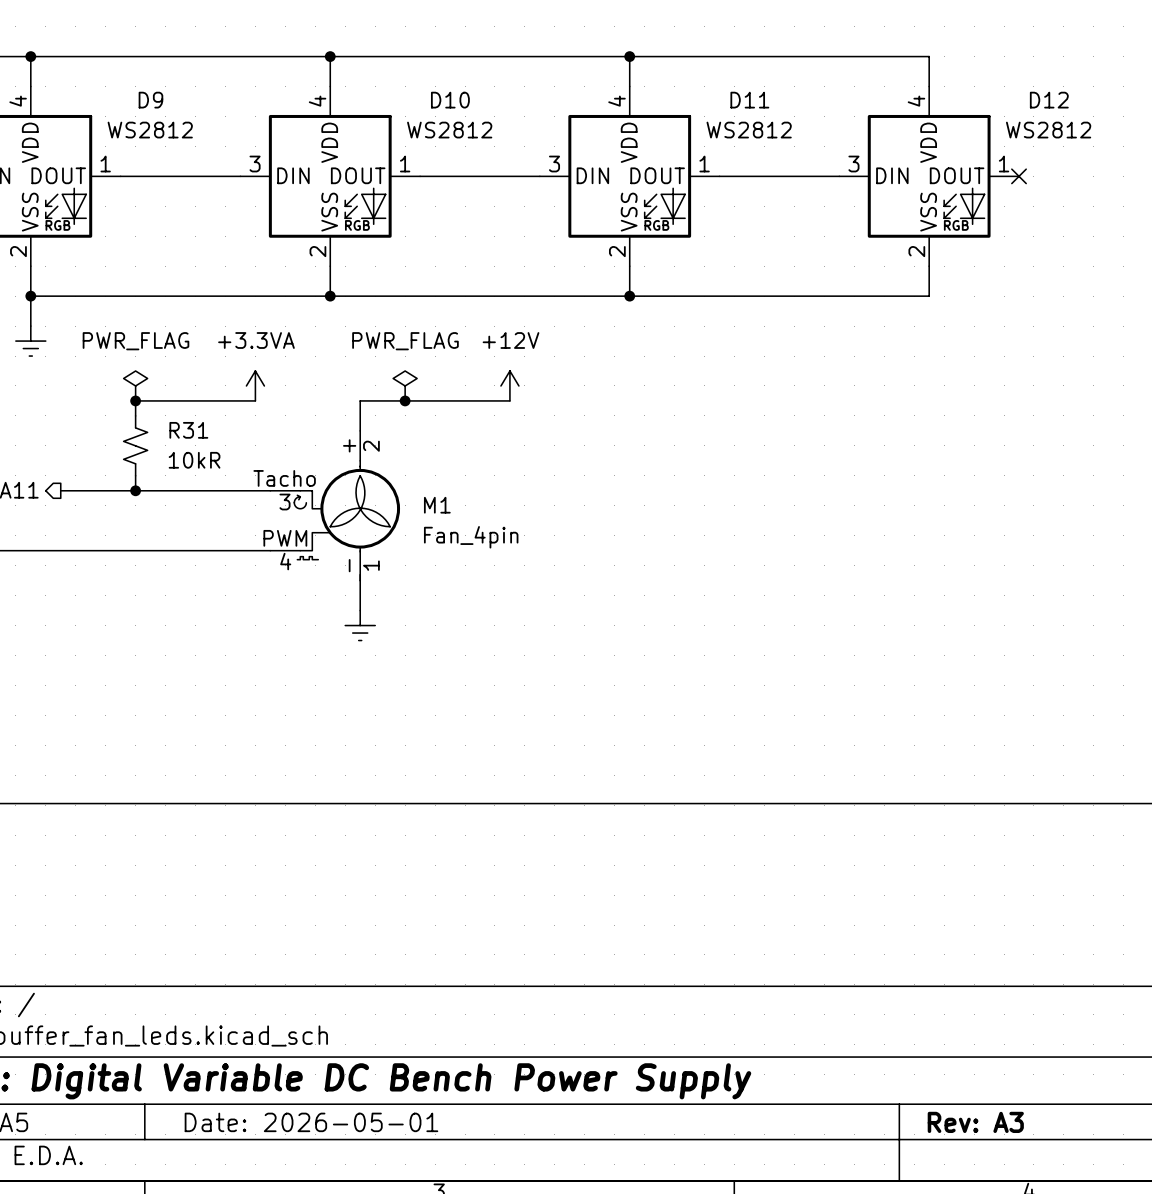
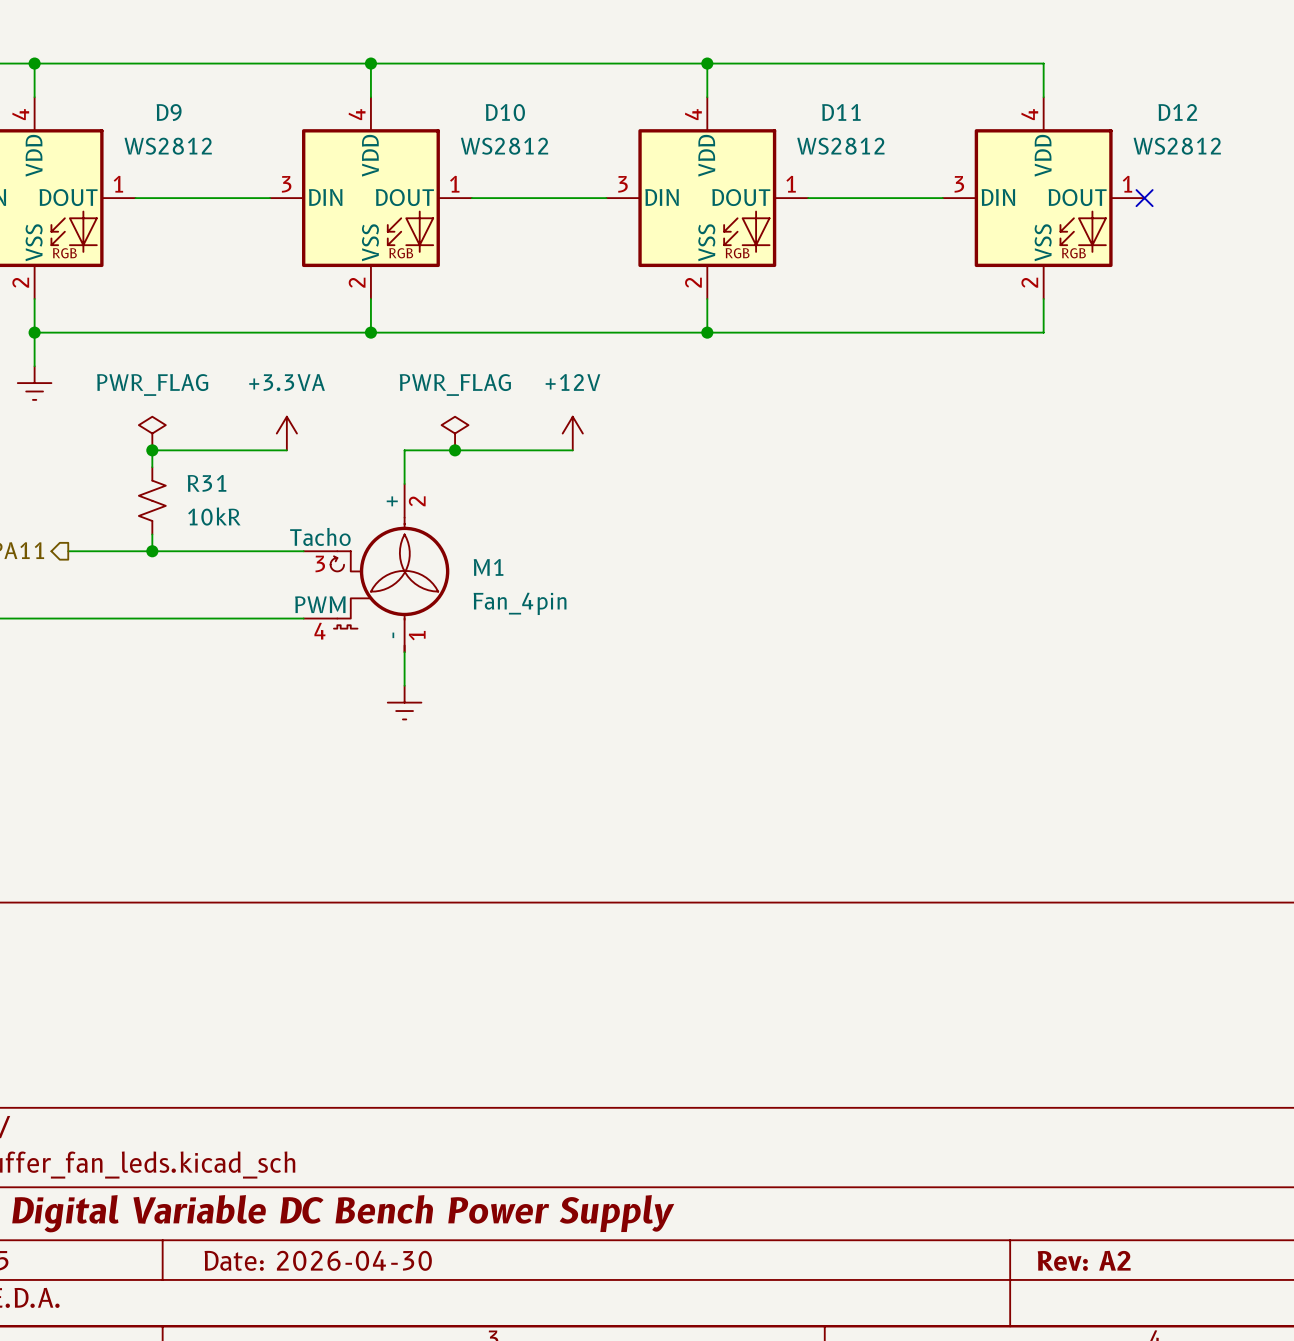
title block: Date: 2026-05-01 (311, 1122) -> Date: 2026-04-30 (318, 1260)
title block: Rev: A3 (975, 1122) -> Rev: A2 (1084, 1260)

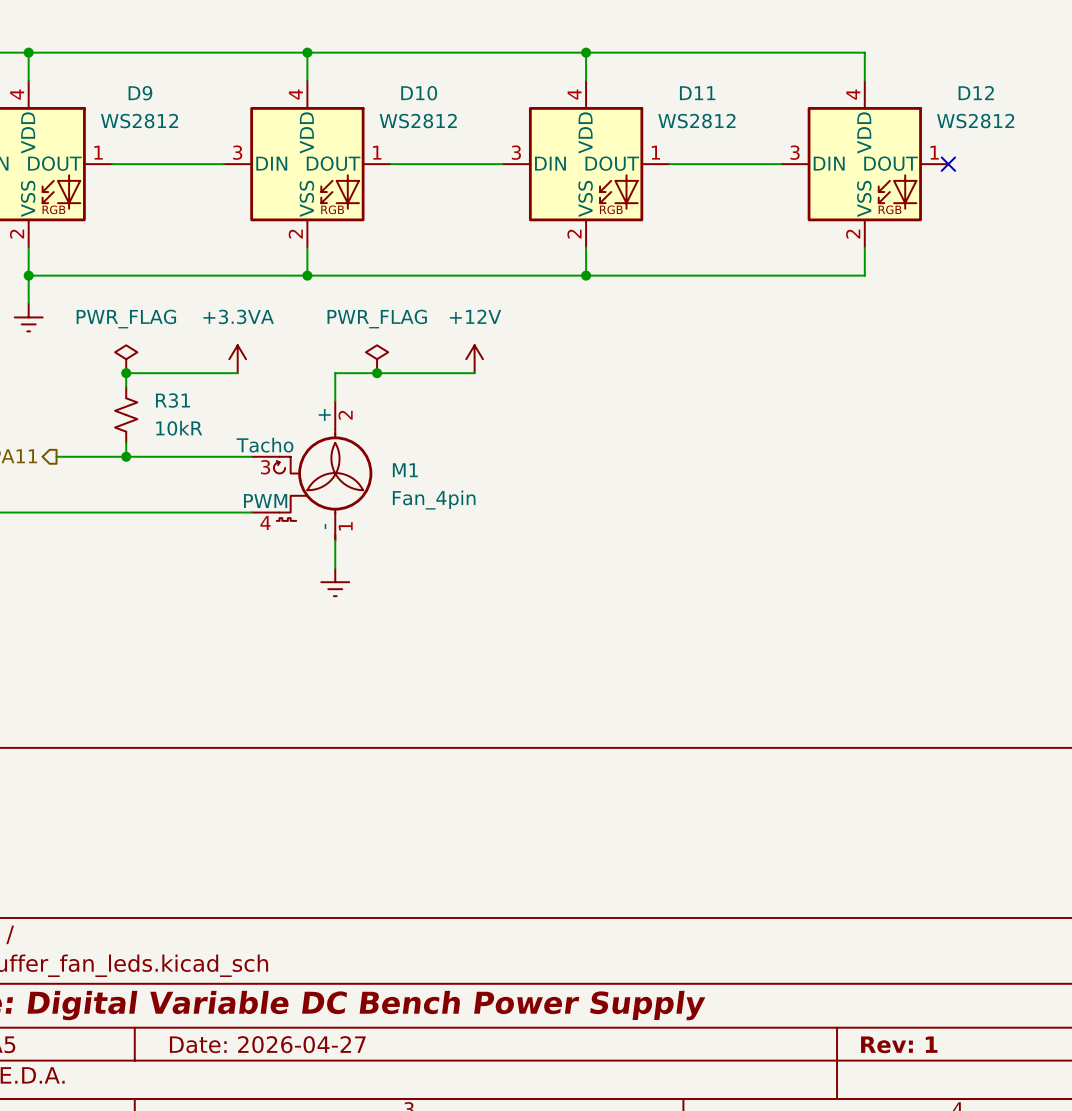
title block: Date: 2026-04-30 (318, 1260) -> Date: 2026-04-27 (267, 1044)
title block: Rev: A2 (1084, 1260) -> Rev: 1 (899, 1044)

